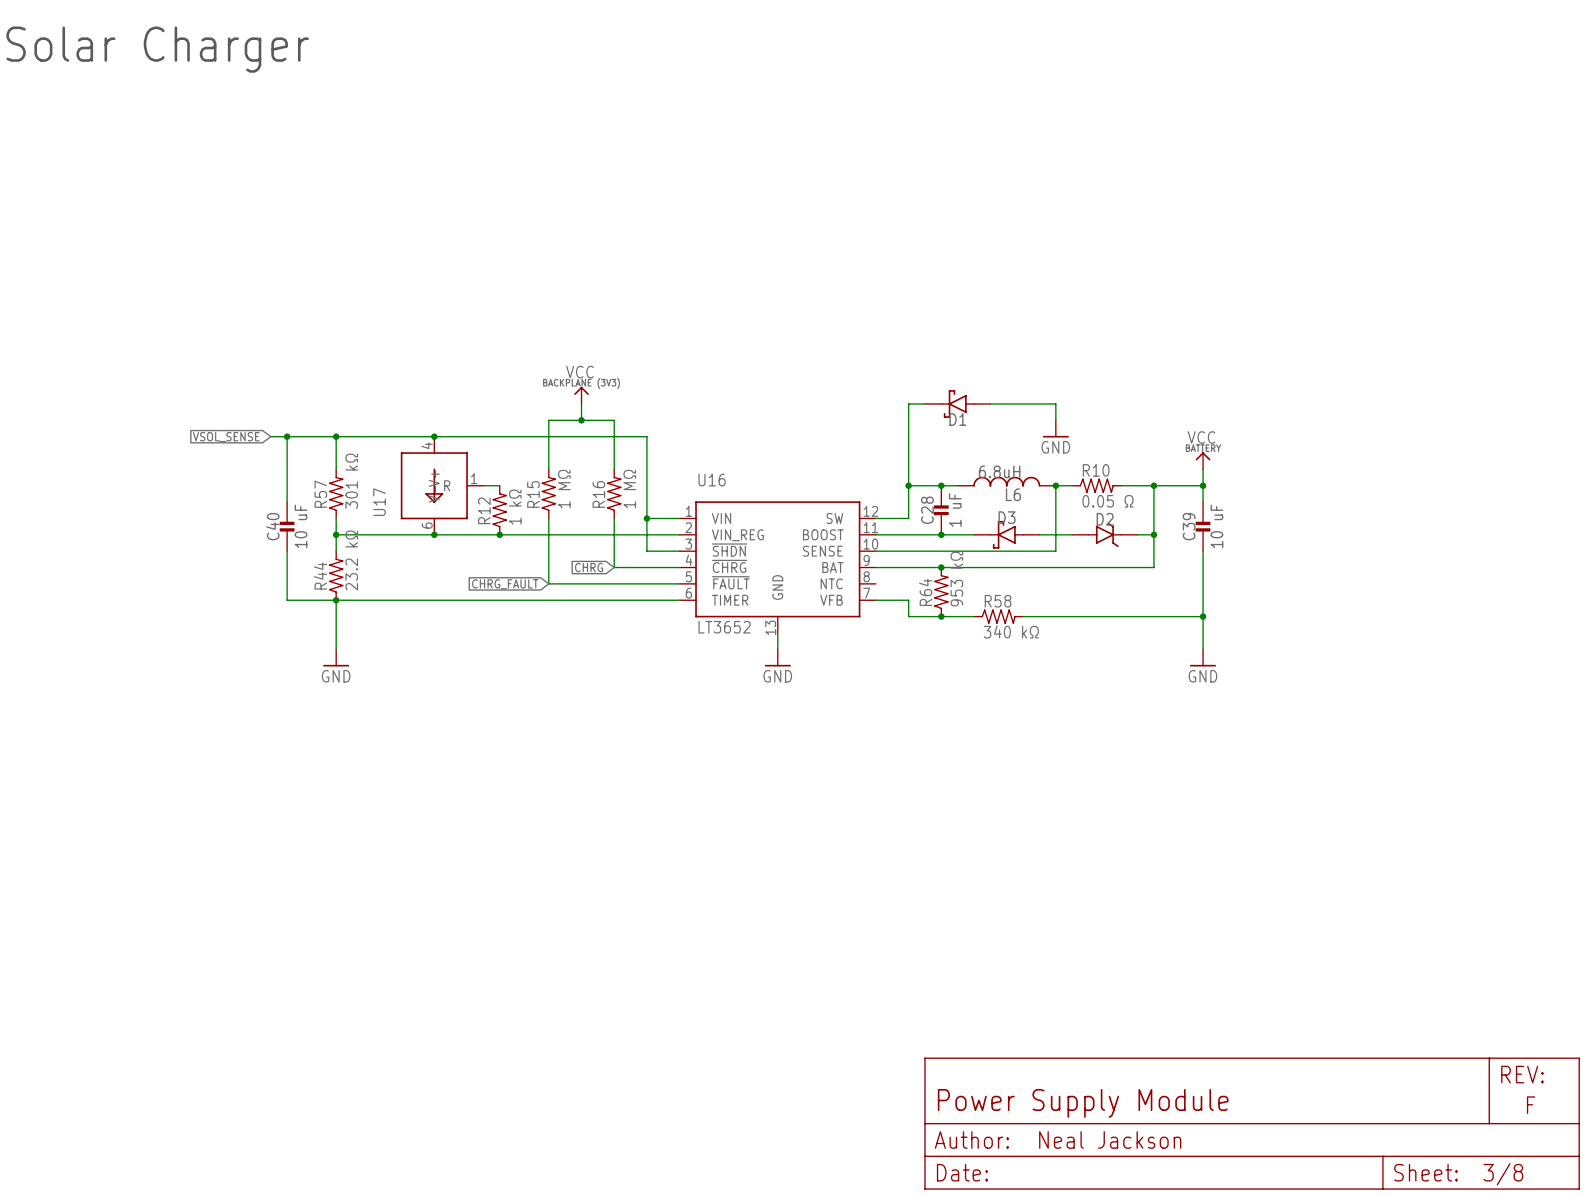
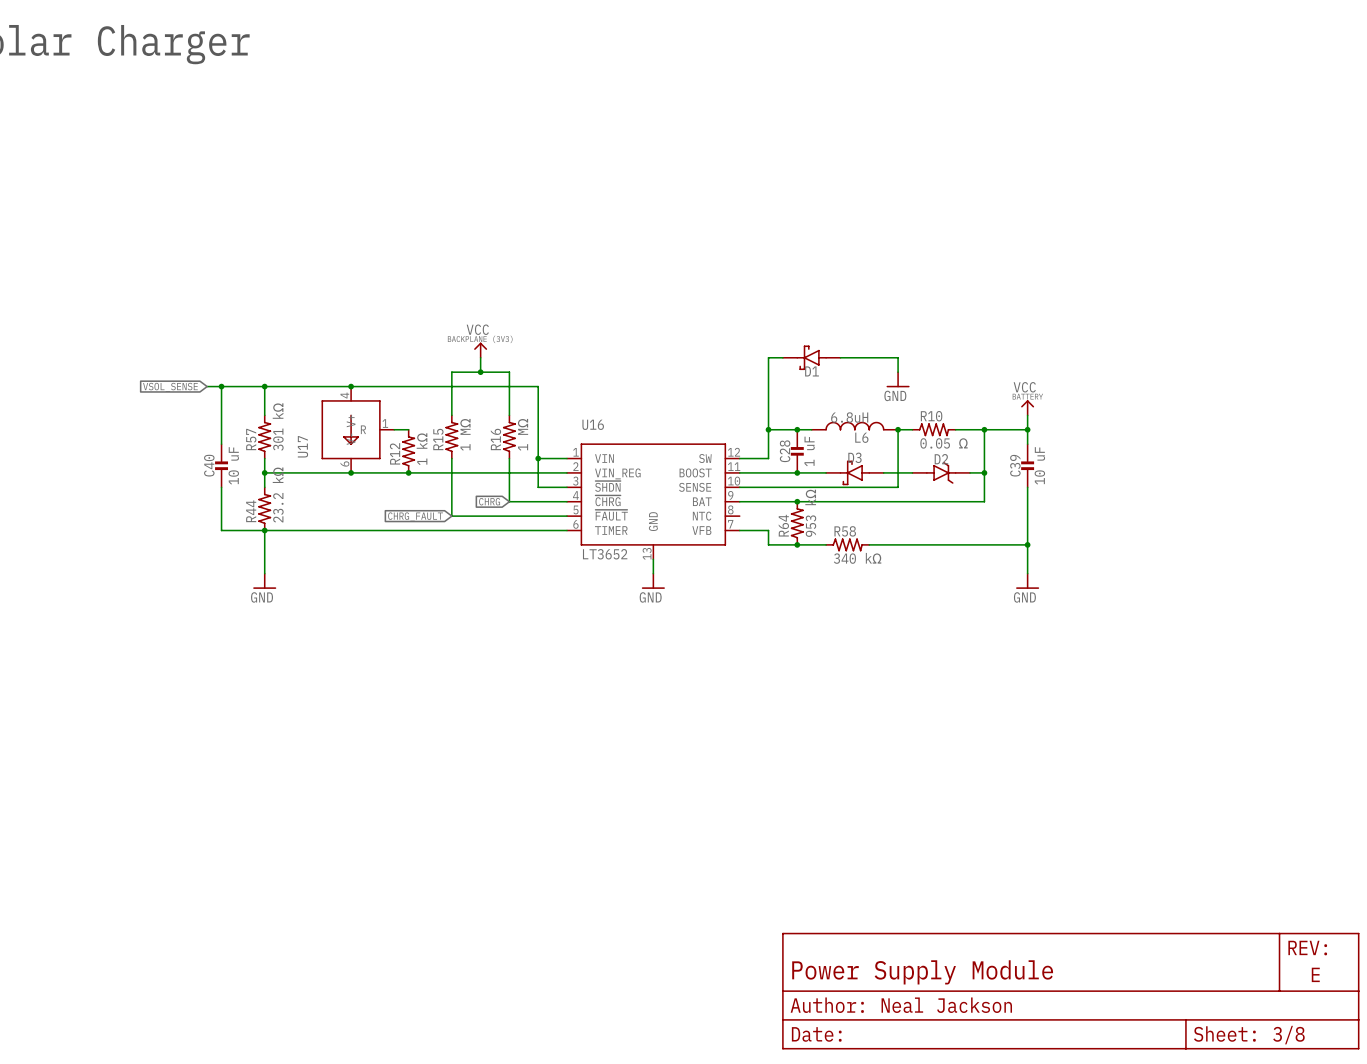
part text: F (1531, 1105) -> E (1315, 974)

